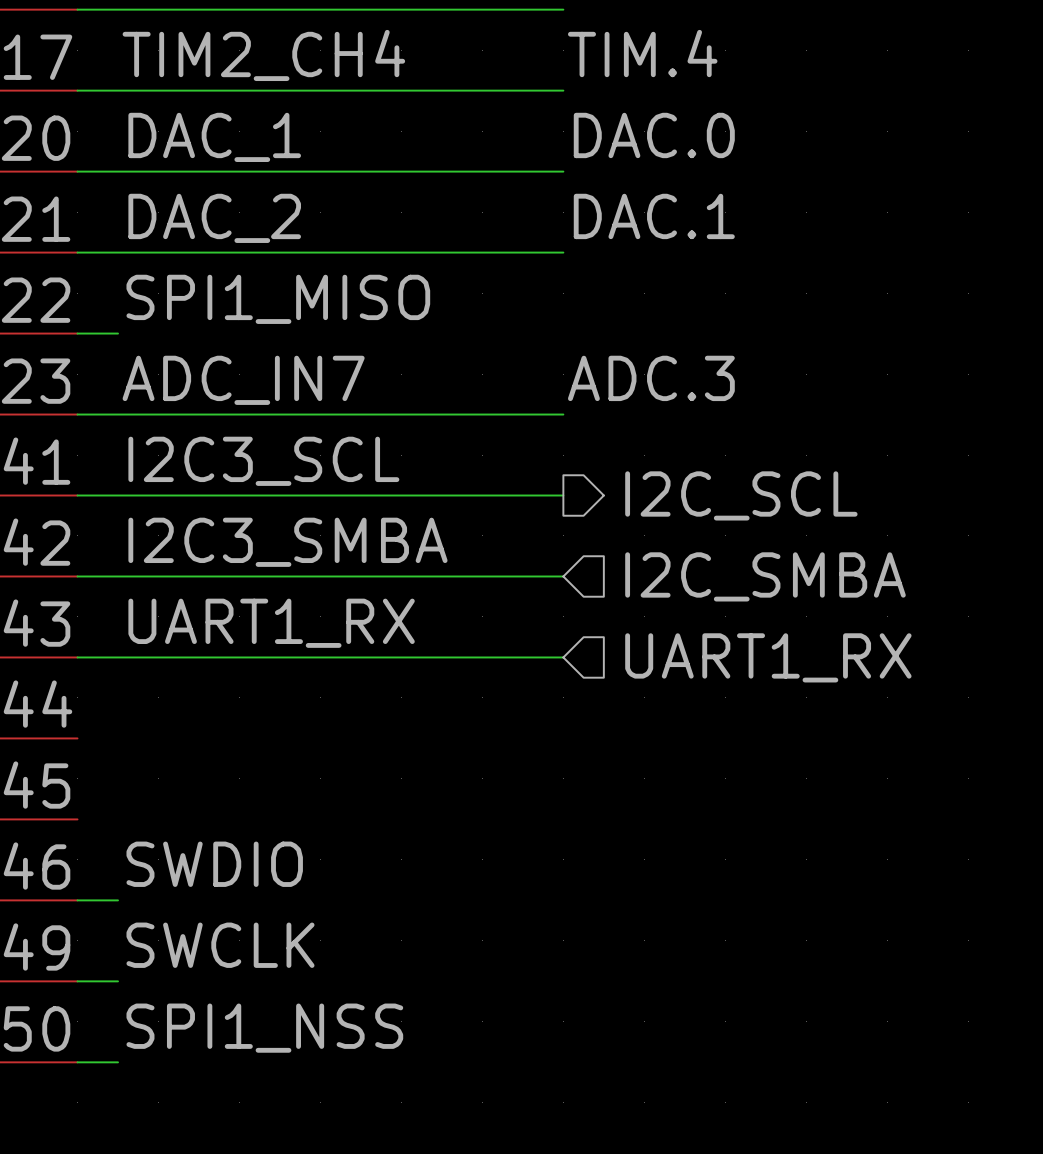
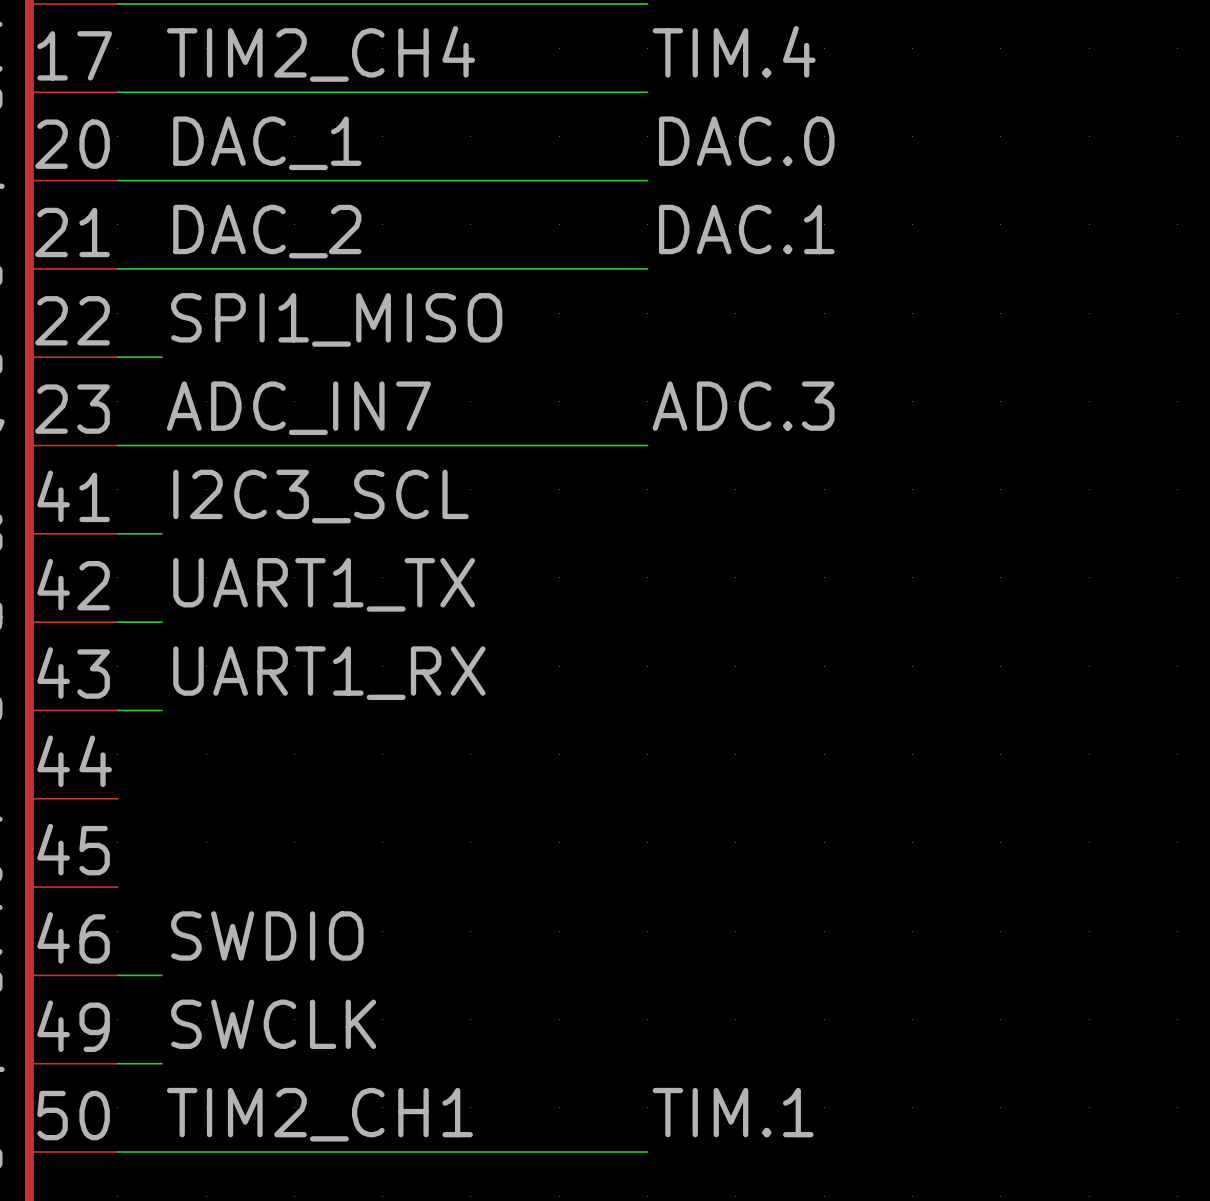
wire: (117, 495) (563, 495) -> none
hierarchical label: I2C_SCL (741, 495) -> none
label: I2C3_SMBA (287, 542) -> UART1_TX (324, 584)
wire: (117, 576) (563, 576) -> none
hierarchical label: I2C_SMBA (765, 576) -> none
wire: (117, 657) (563, 657) -> (161, 1151) (647, 1151)
hierarchical label: UART1_RX (768, 657) -> none
label: none -> TIM.1 (733, 1112)
label: SPI1_NSS (264, 1028) -> TIM2_CH1 (319, 1114)

